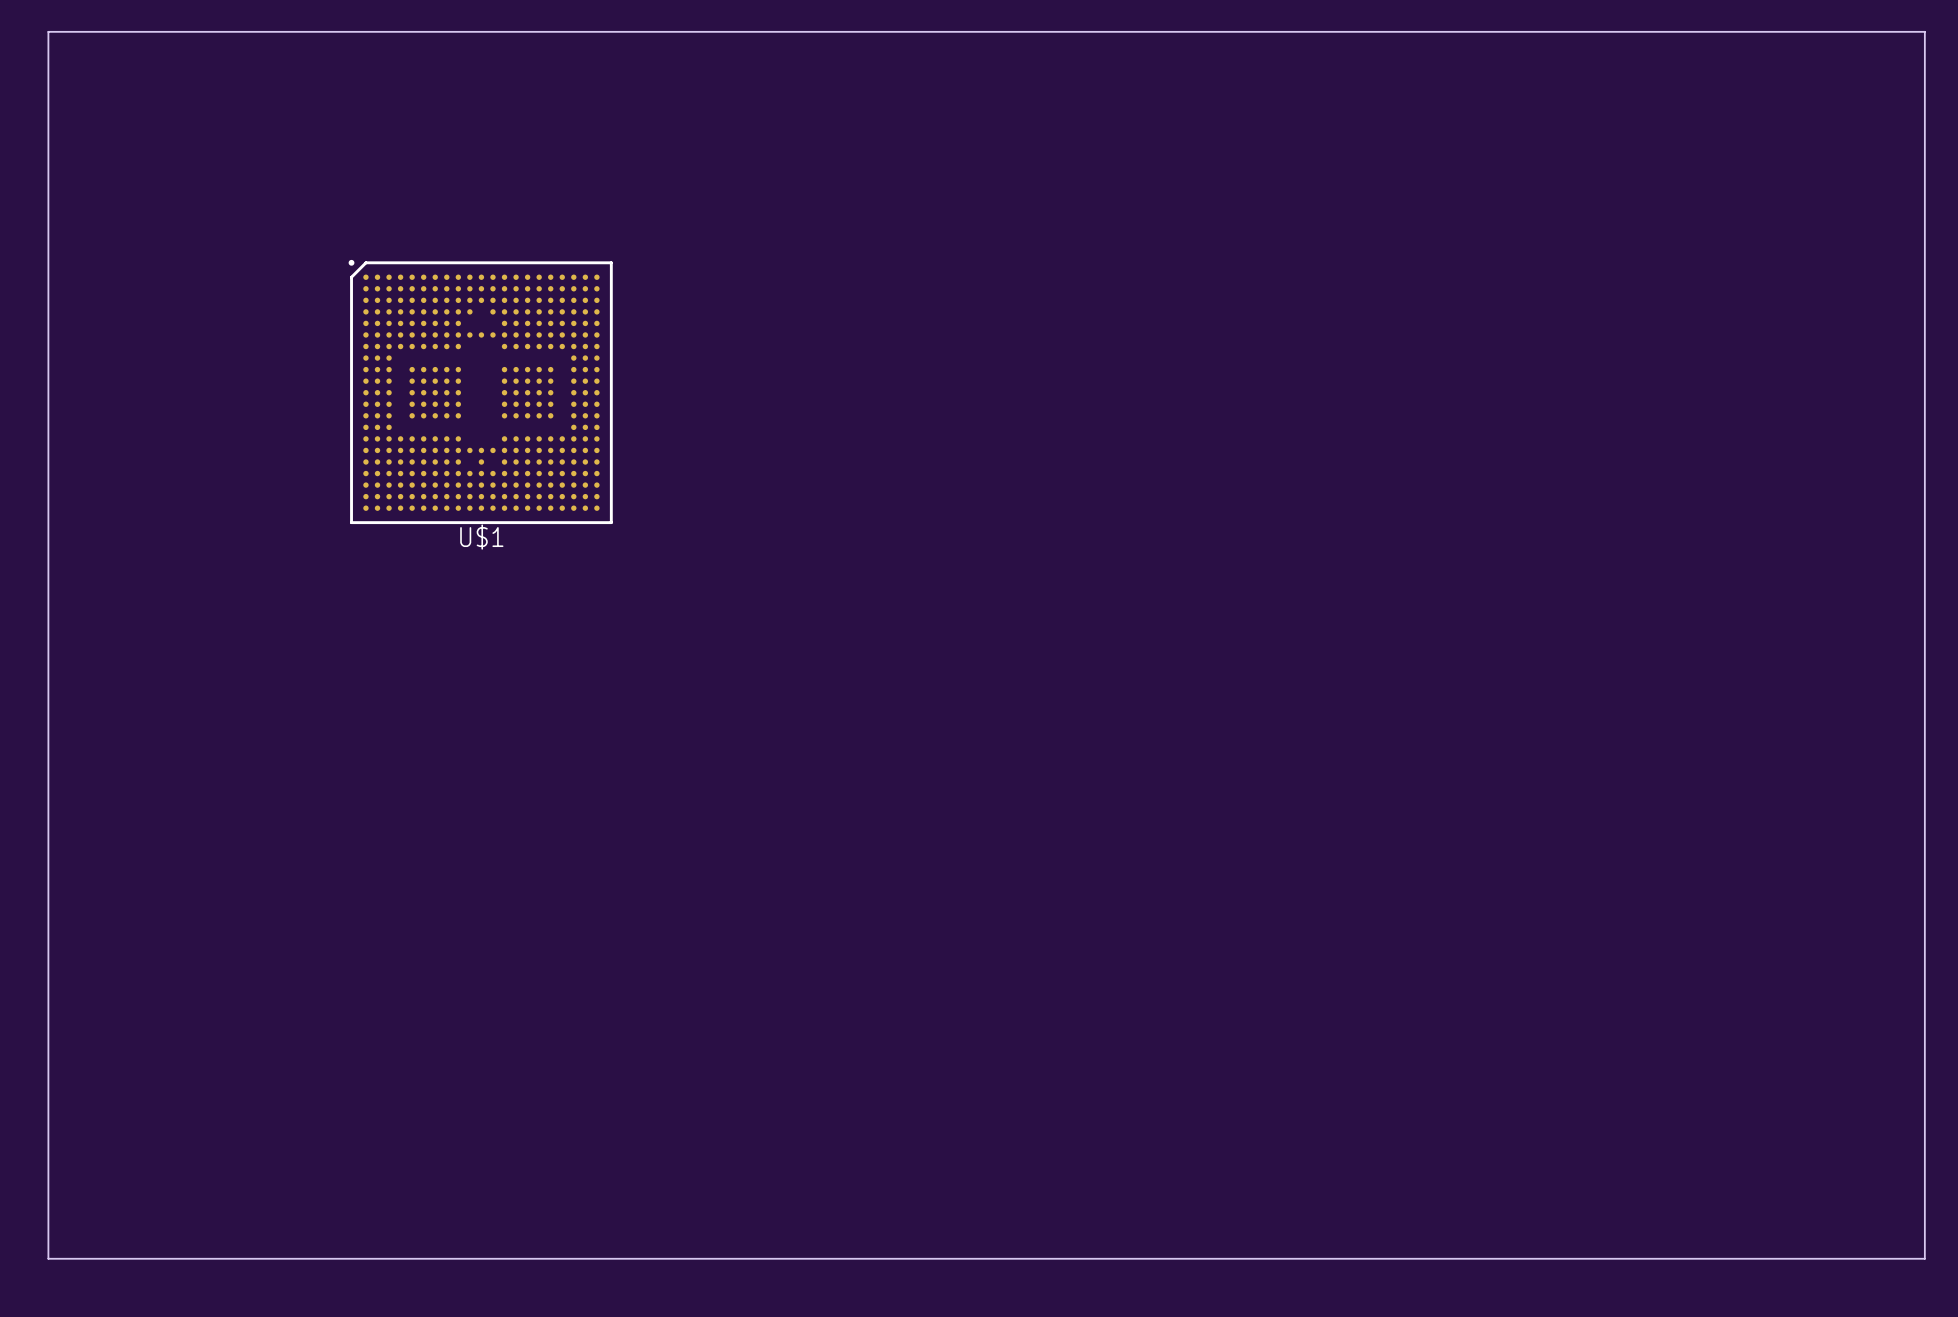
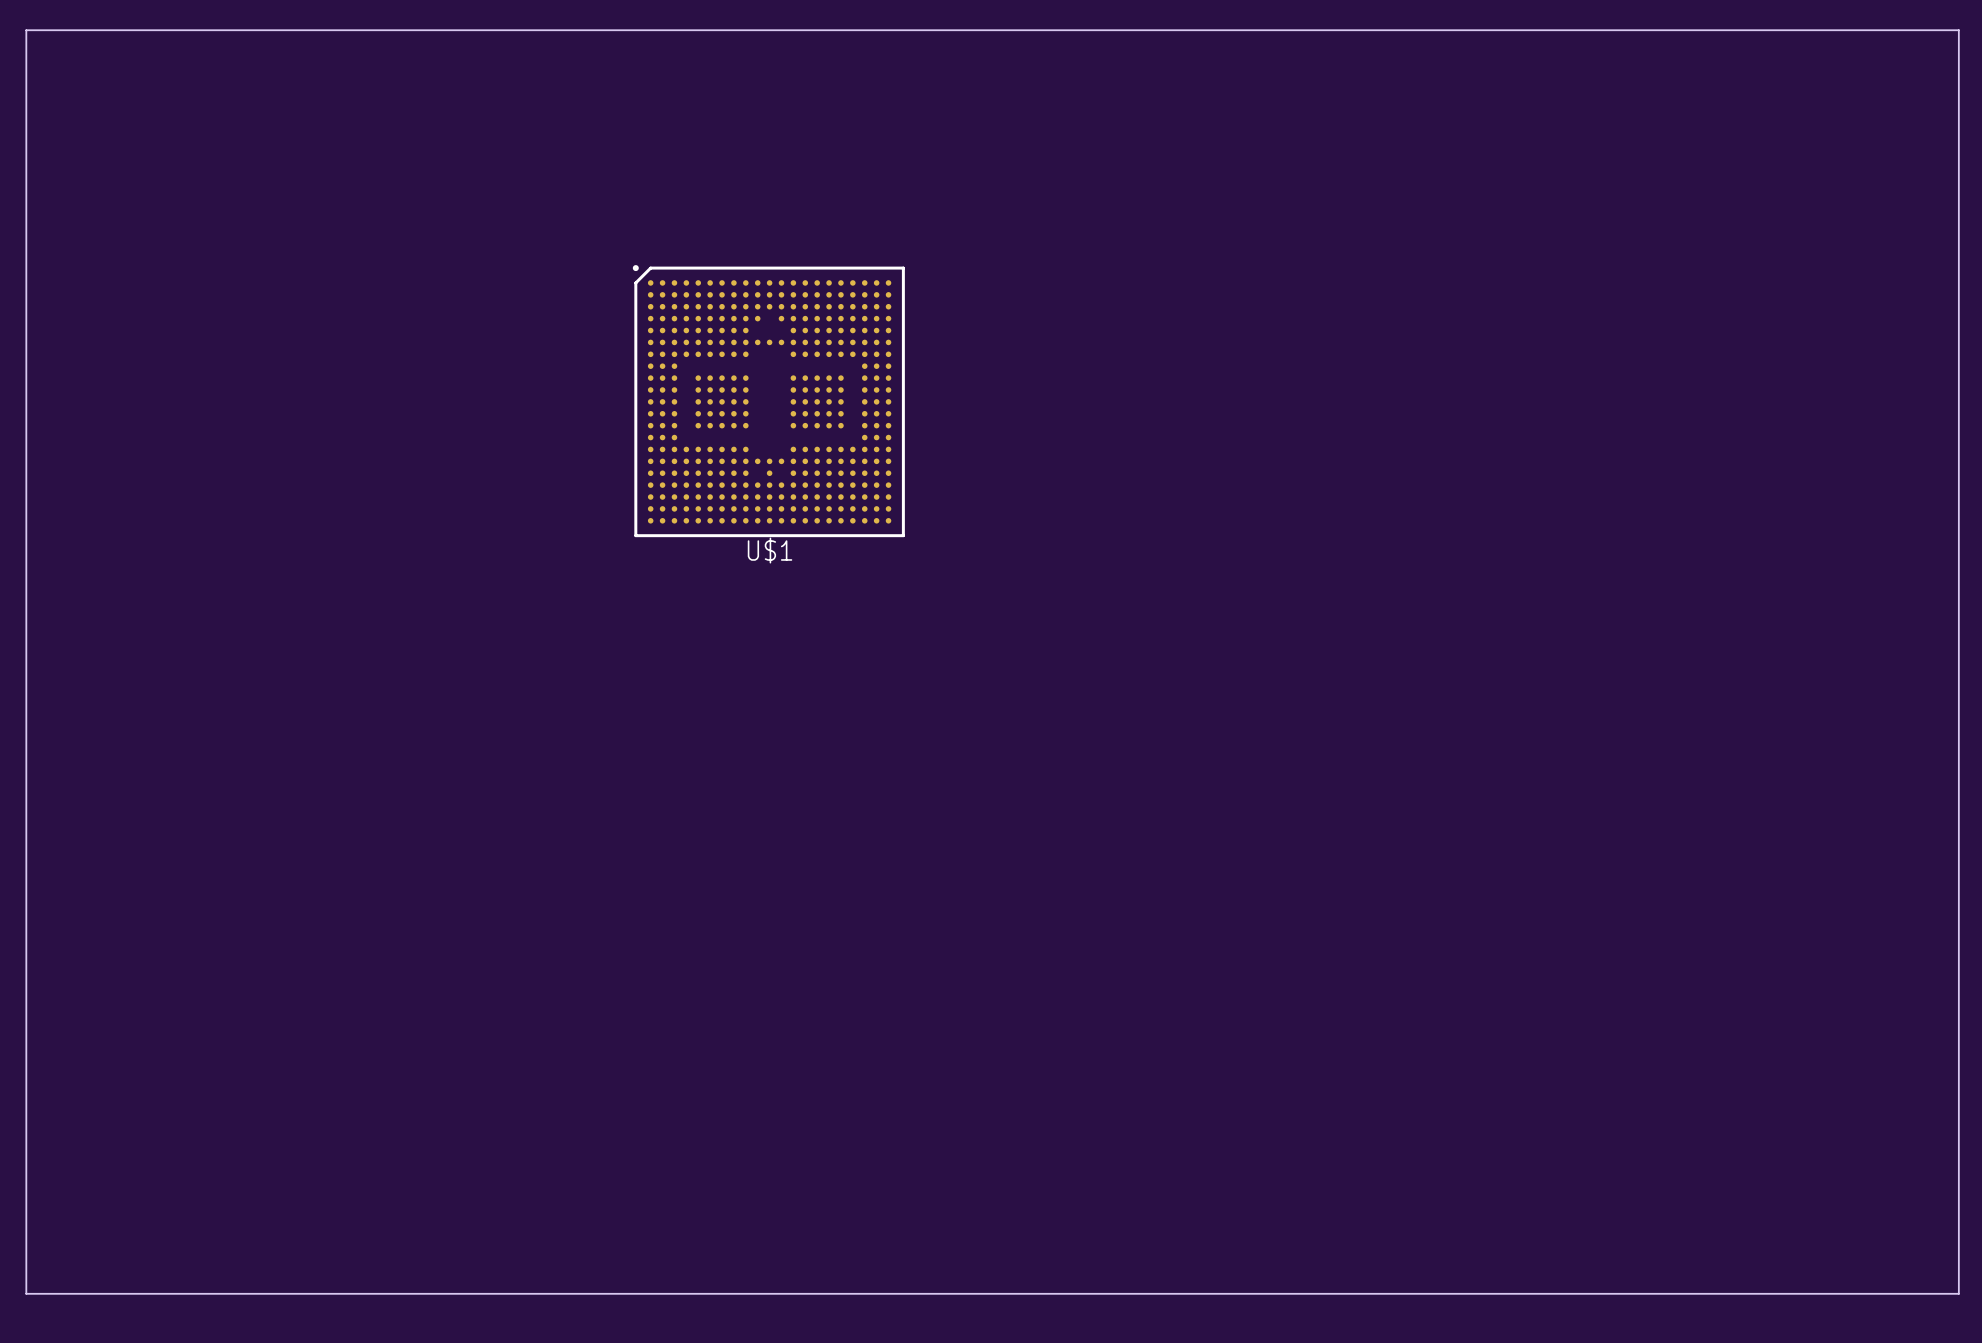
U$1 position: (480, 391) -> (768, 401)

